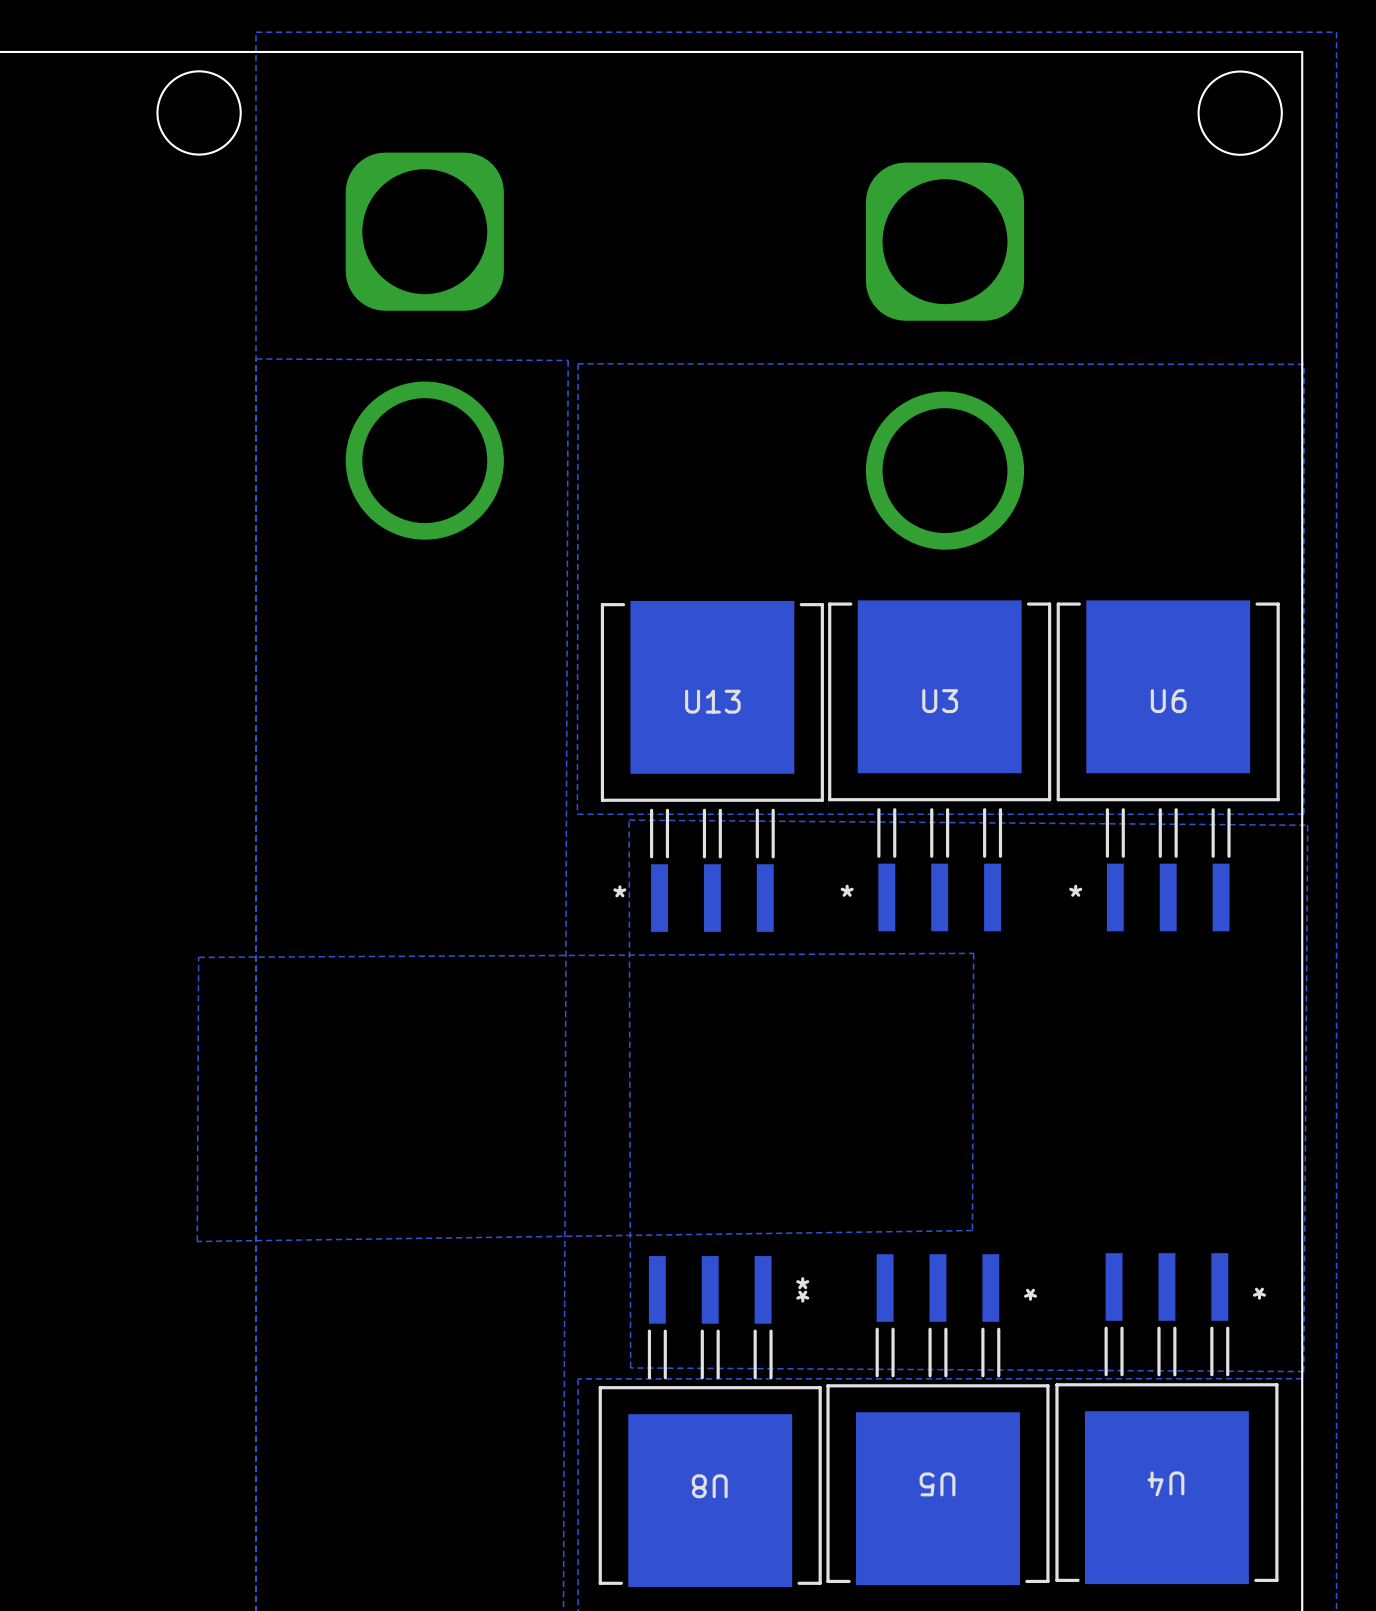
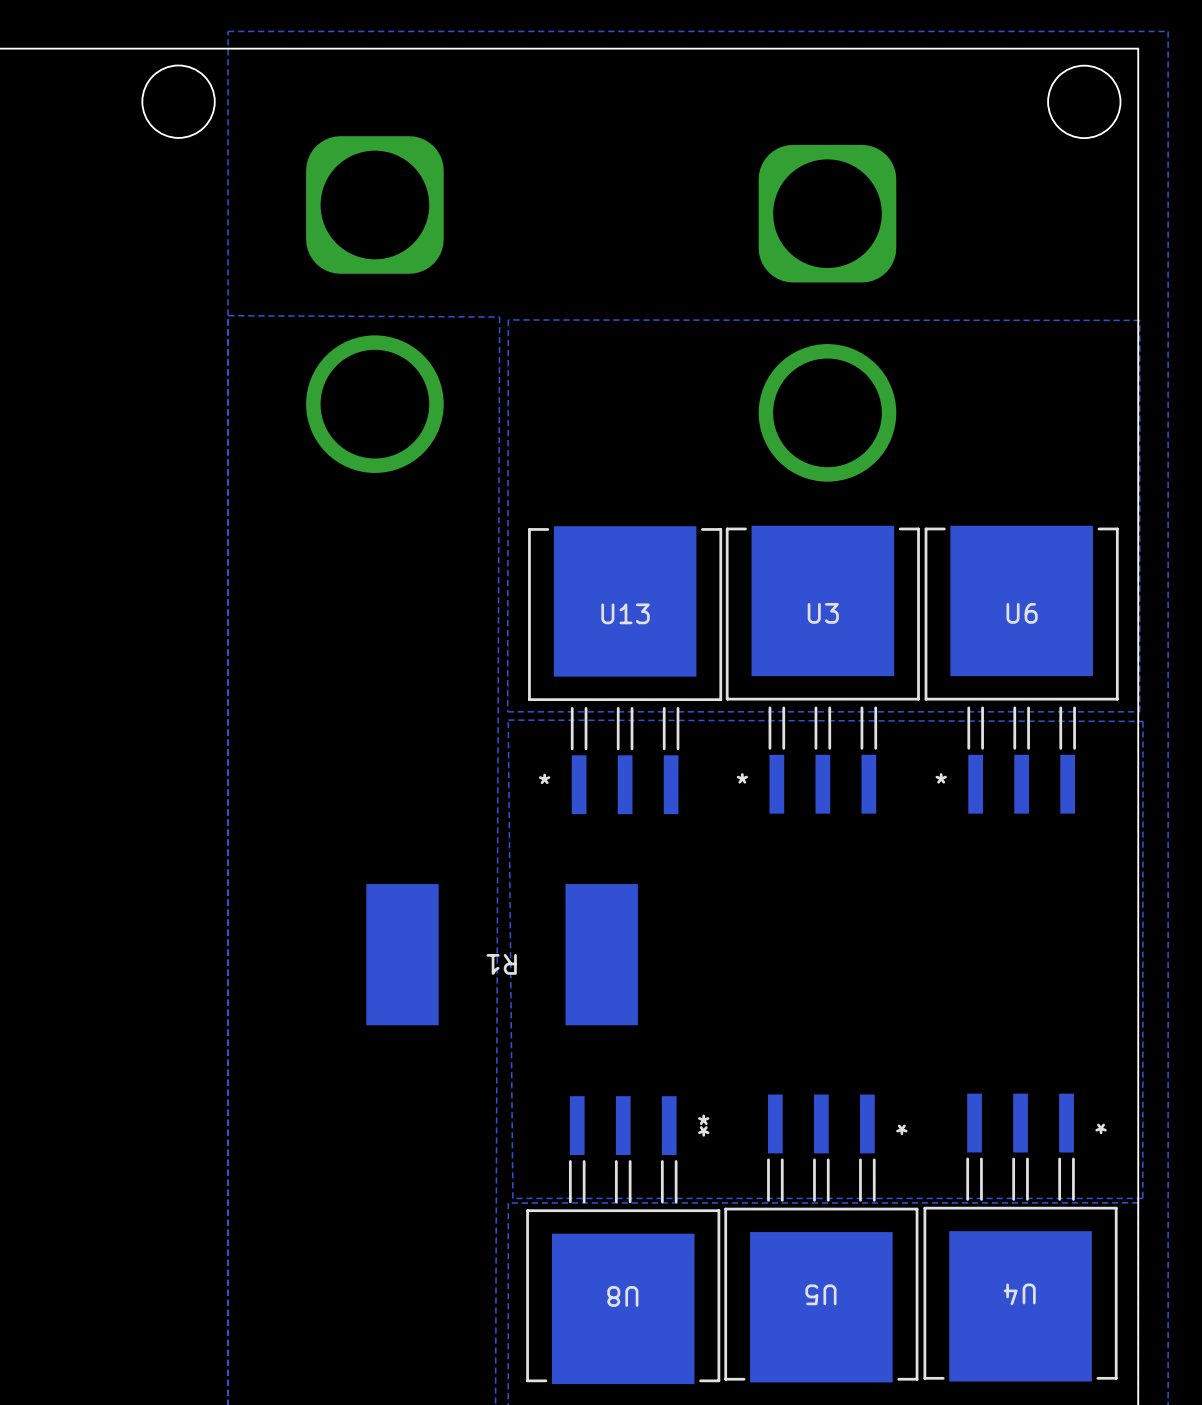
zone outline: (629, 820) (630, 1367) (1303, 1371) (1307, 825) (629, 820) -> (508, 720) (1142, 721) (1142, 1198) (512, 1198) (508, 720)
zone outline: (973, 953) (972, 1230) (197, 1241) (198, 957) (973, 953) -> none
R1: none -> (502, 954)

